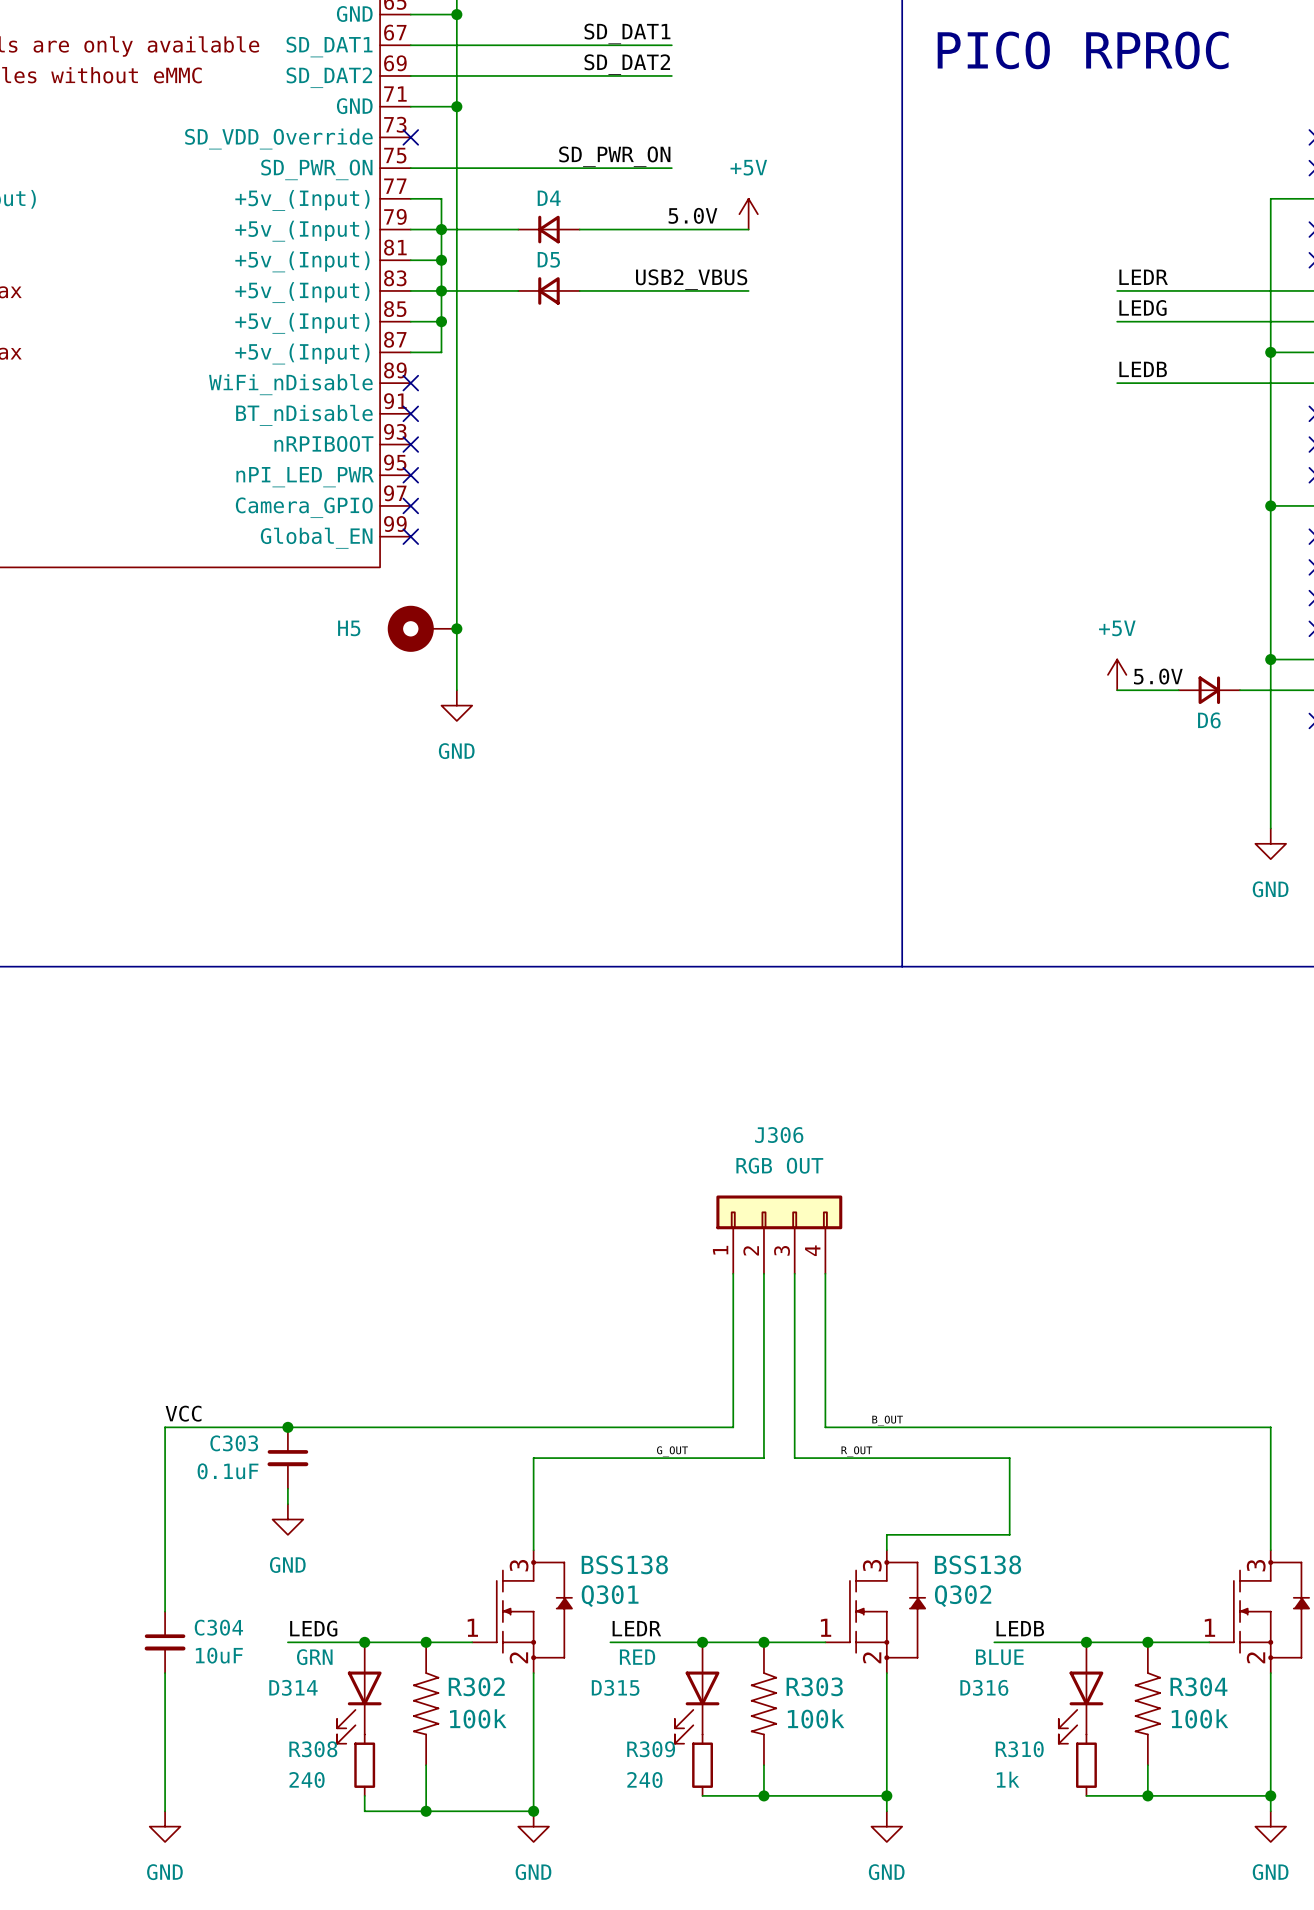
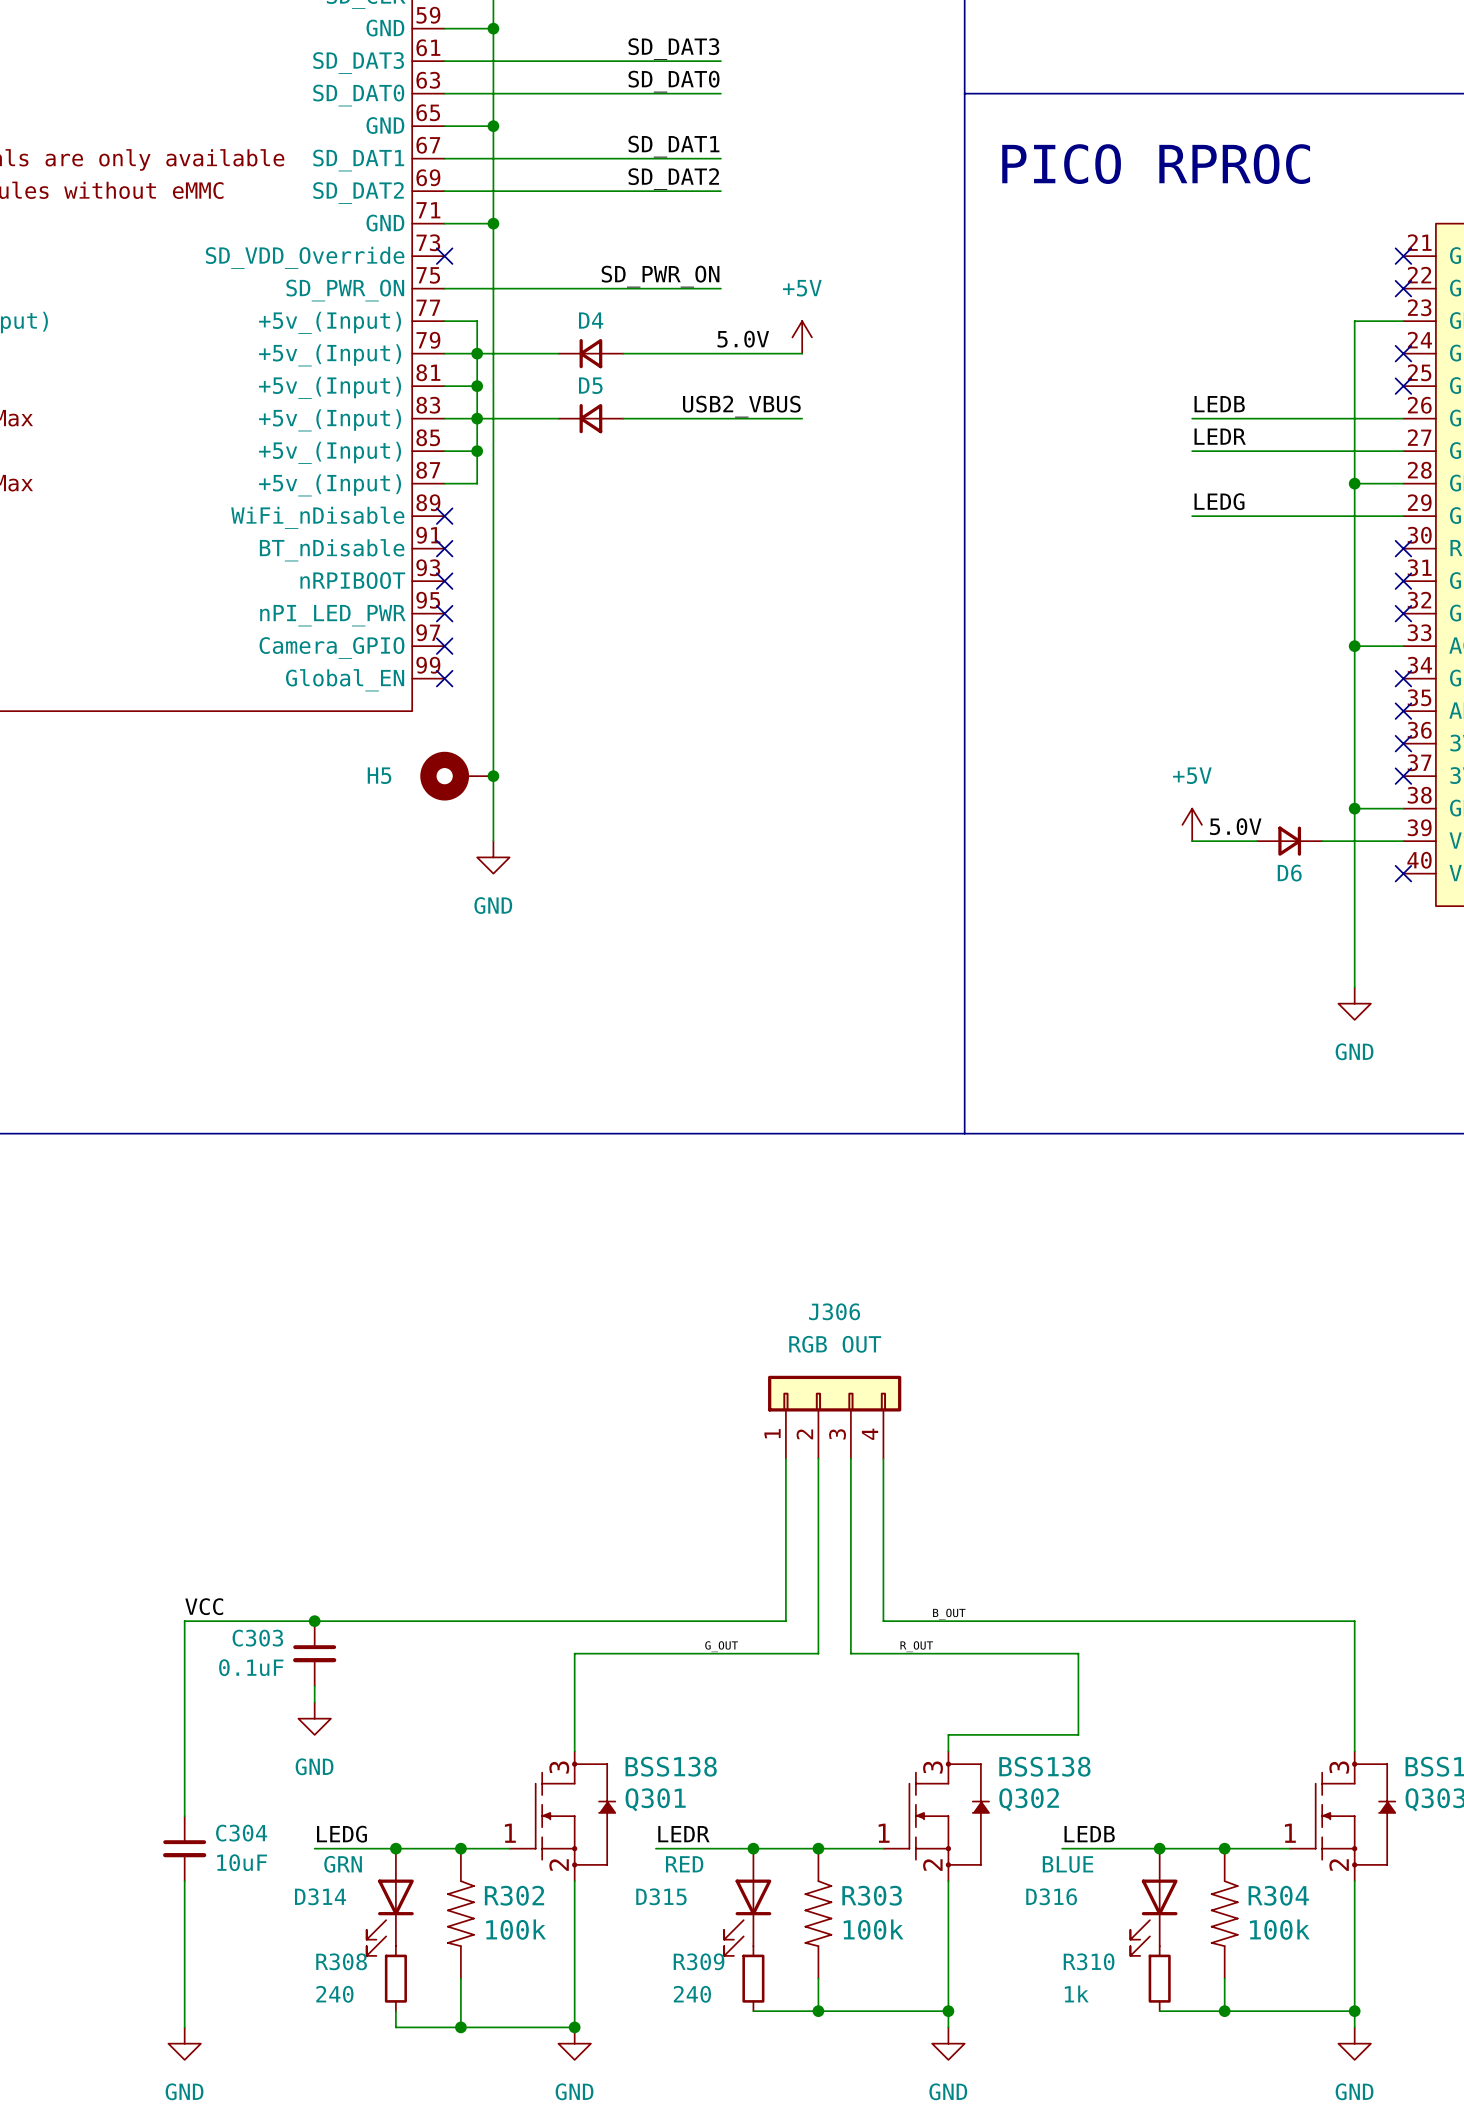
label: LEDR (1143, 277) -> LEDB (1219, 404)
label: LEDG (1142, 307) -> LEDR (1220, 436)
label: LEDB (1143, 369) -> LEDG (1219, 501)

